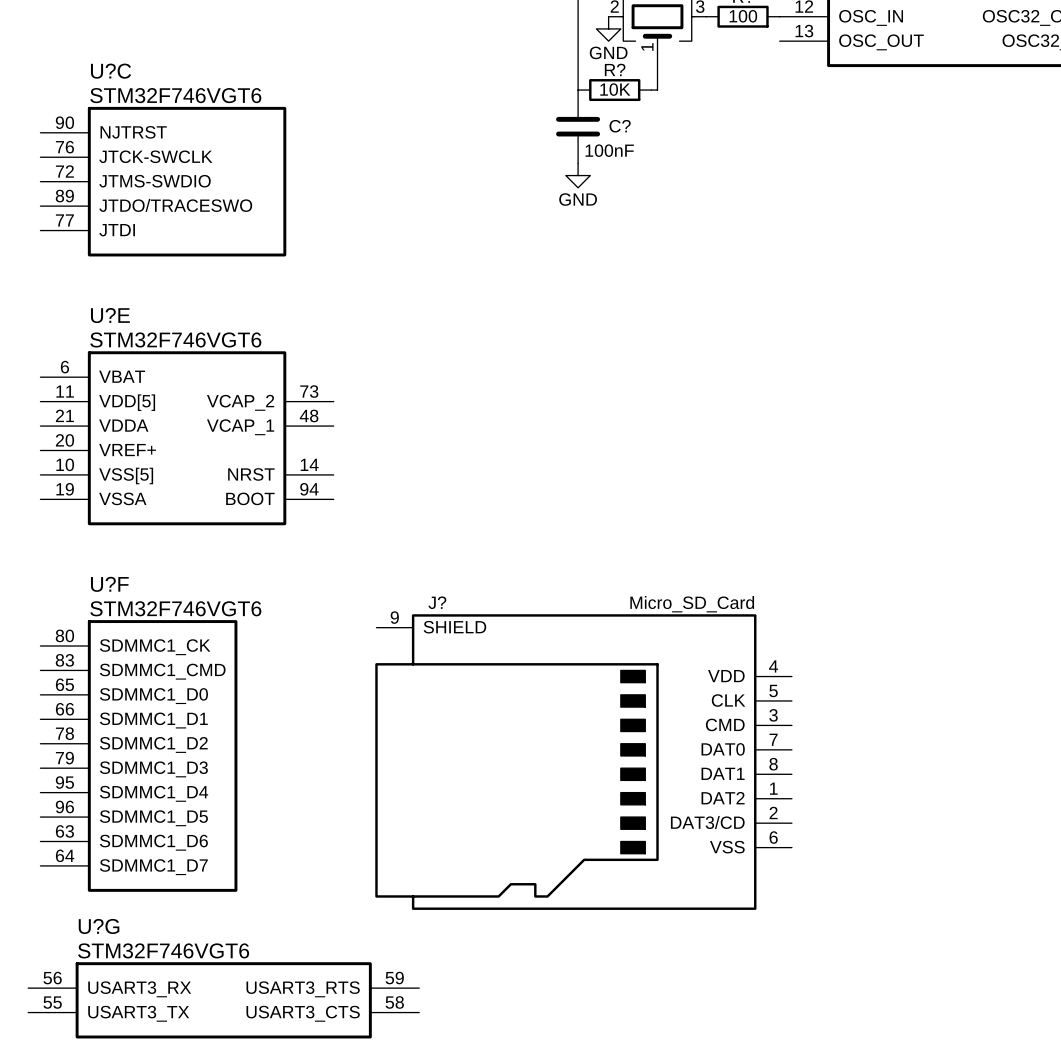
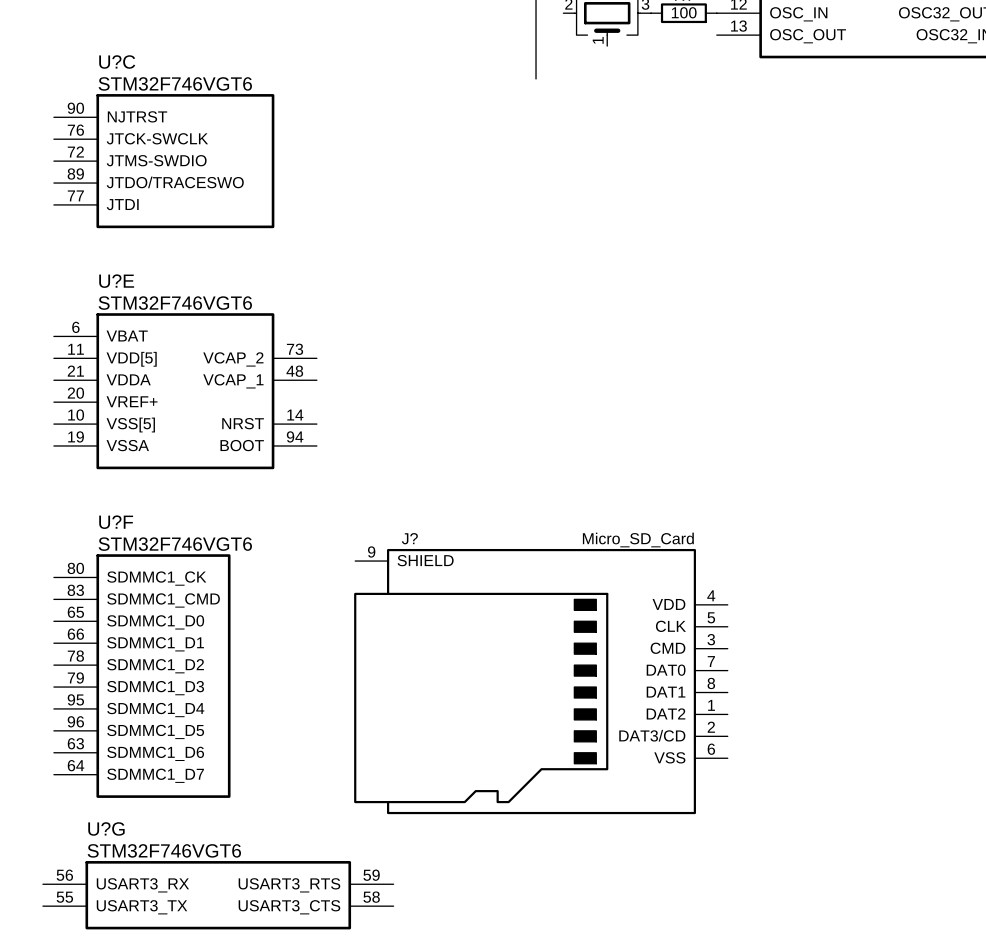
power symbol: GND (608, 28) -> none
wire: (657, 53) (657, 90) (651, 90) -> none
R?: 10K (614, 90) -> none
C?: 100nF (578, 126) -> none
power symbol: GND (578, 175) -> none

